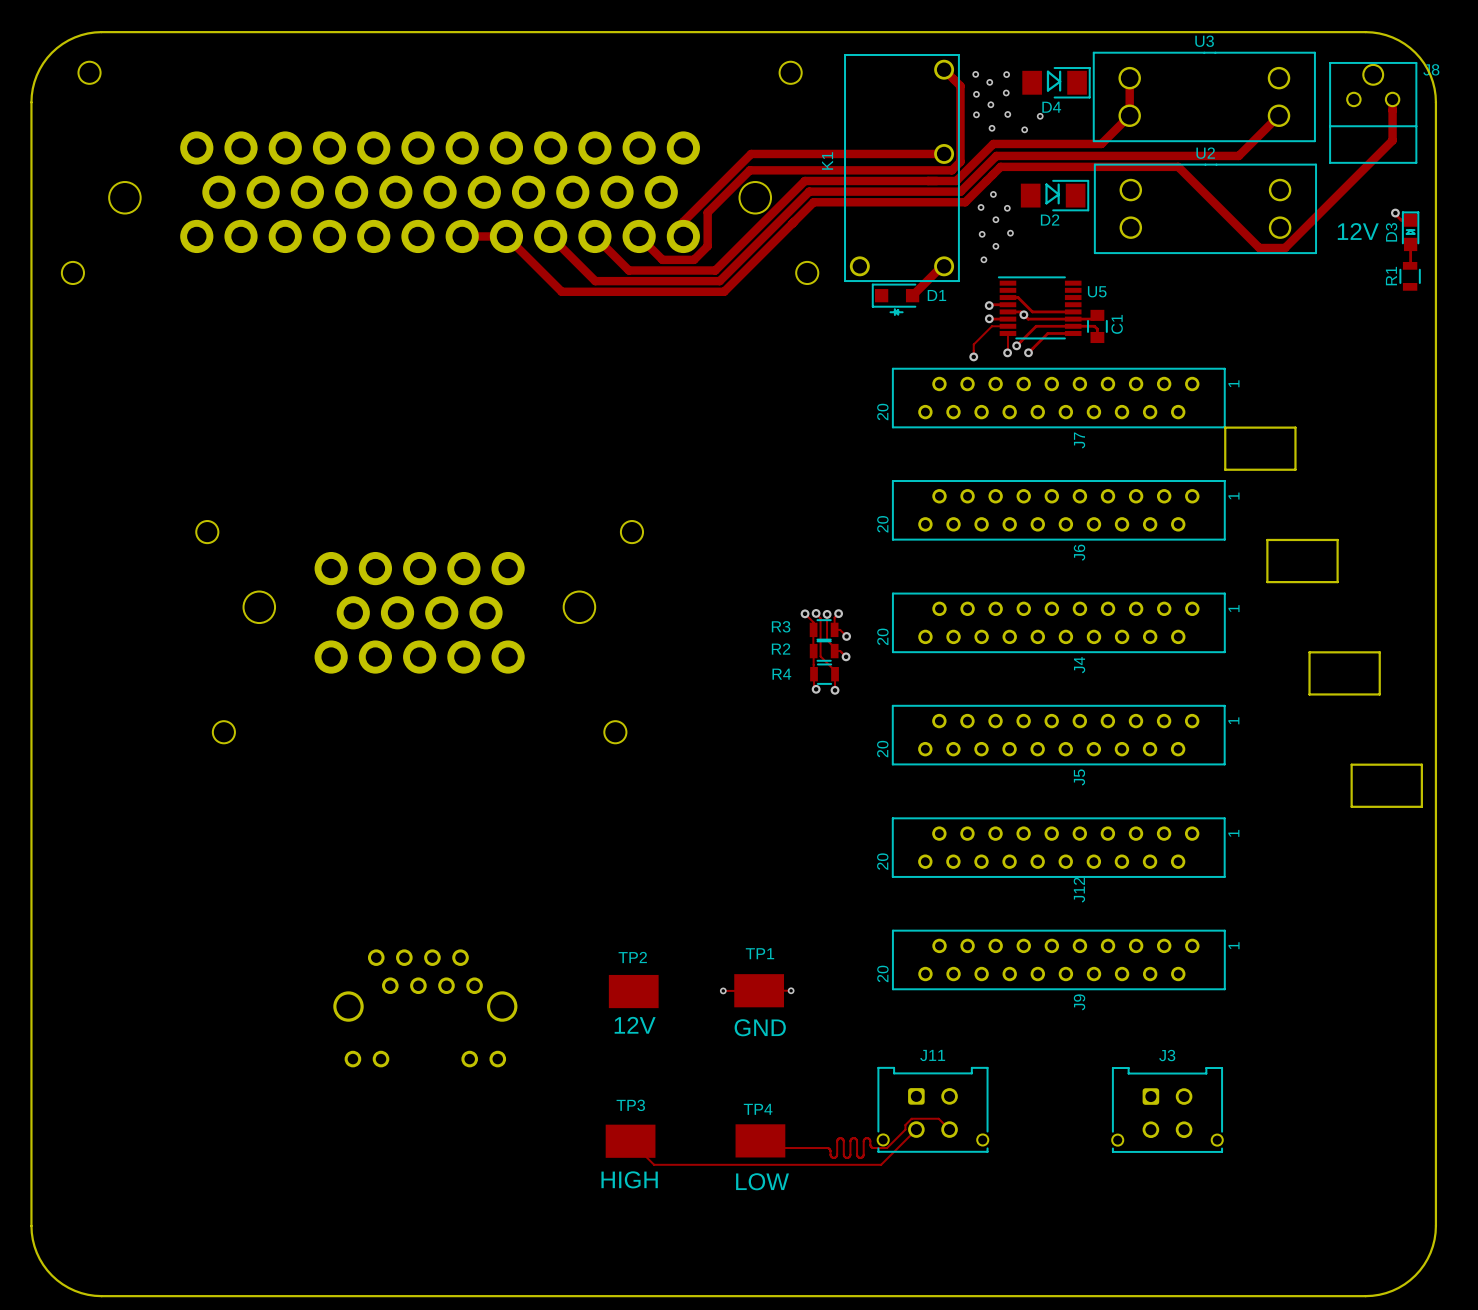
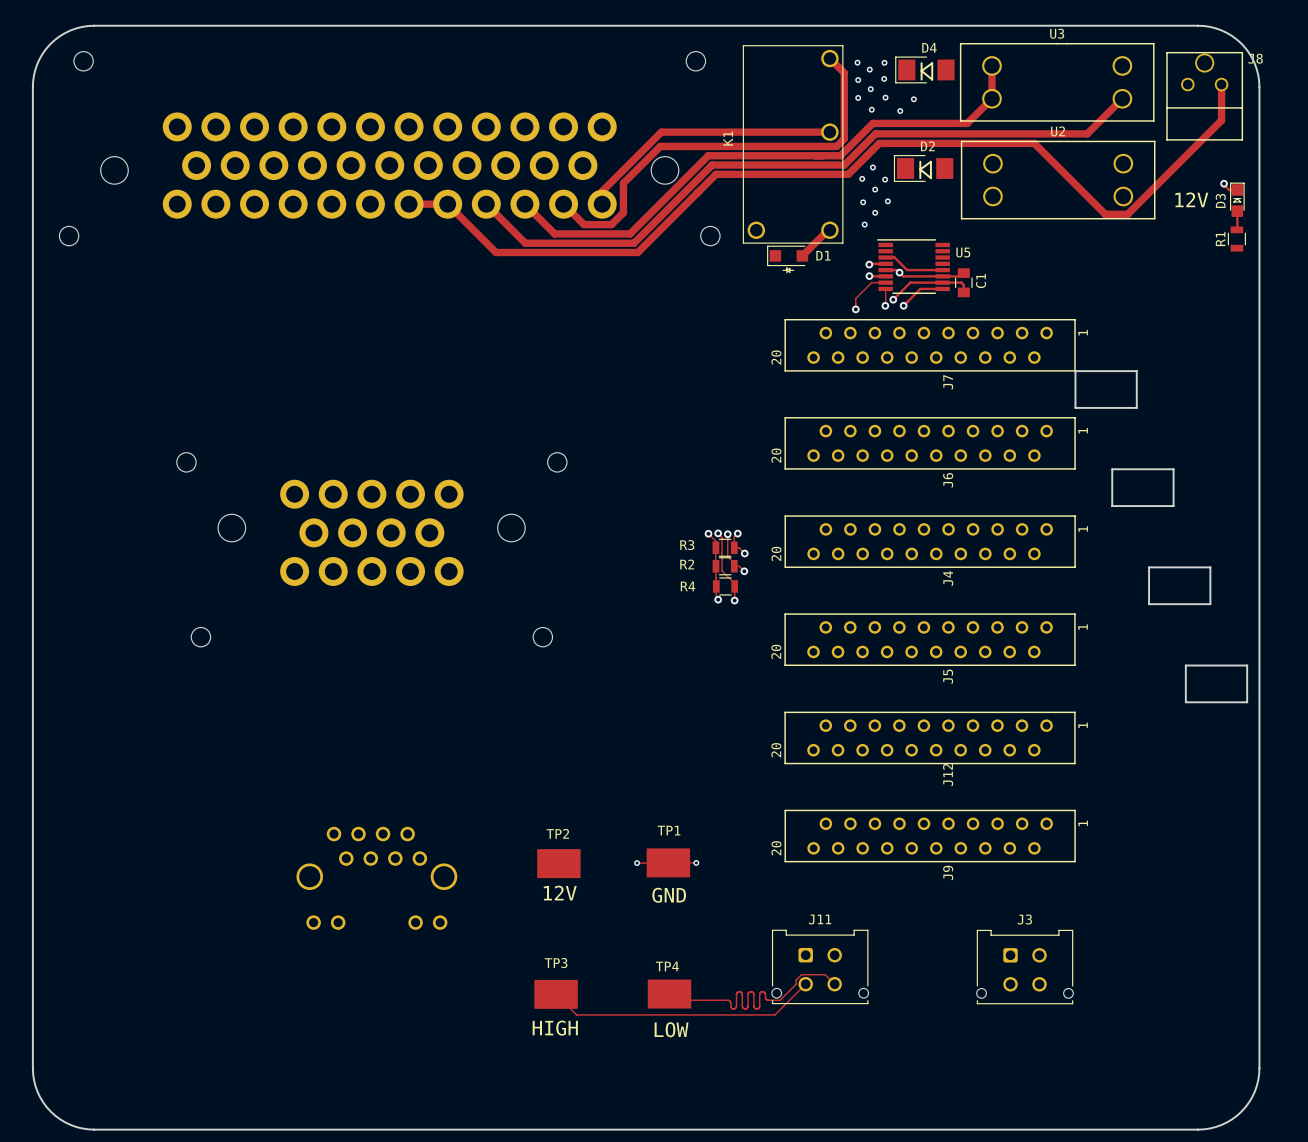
D4 rotation: 0° (1056, 82) -> 180° (924, 69)
D2 rotation: 0° (1054, 195) -> 180° (923, 168)

